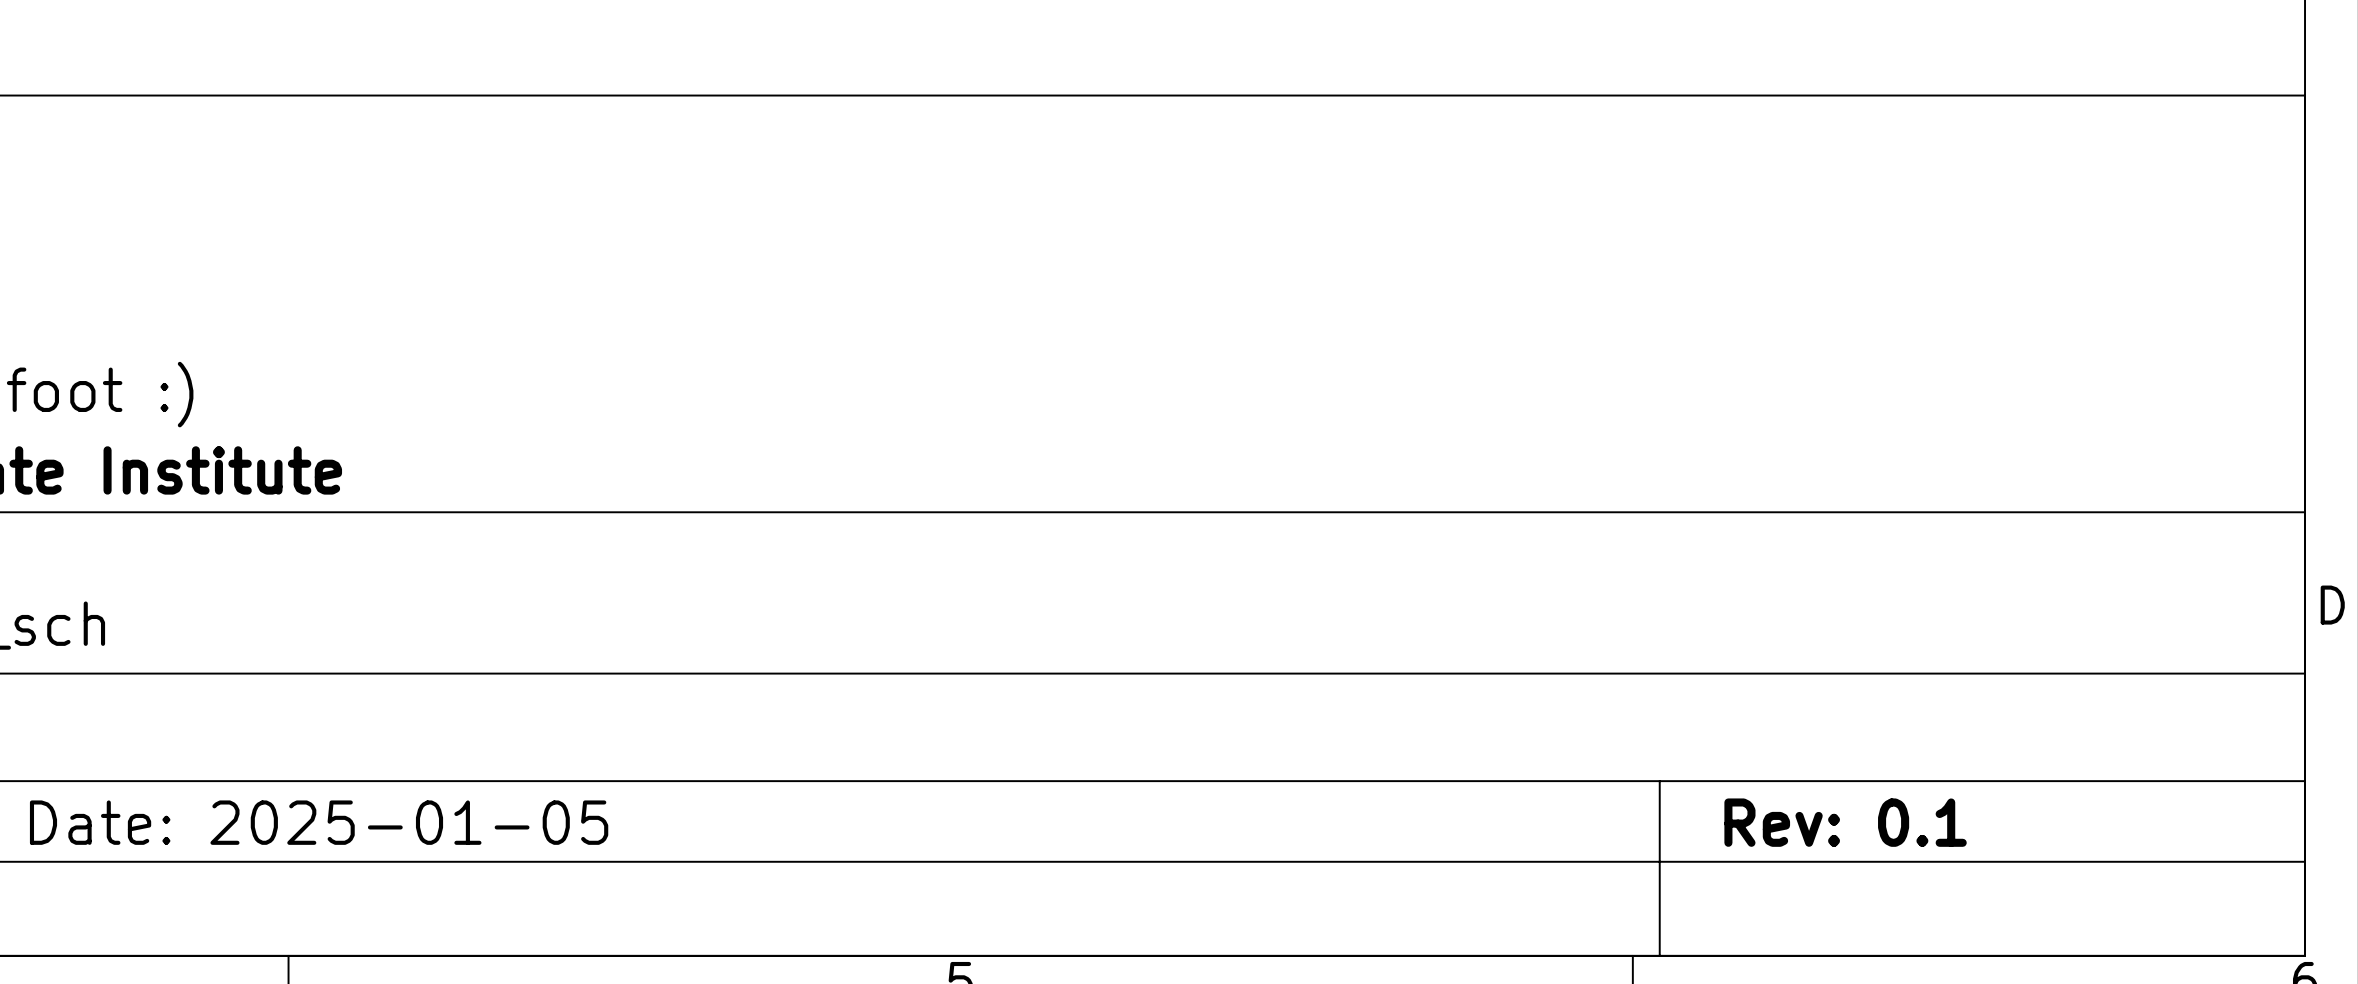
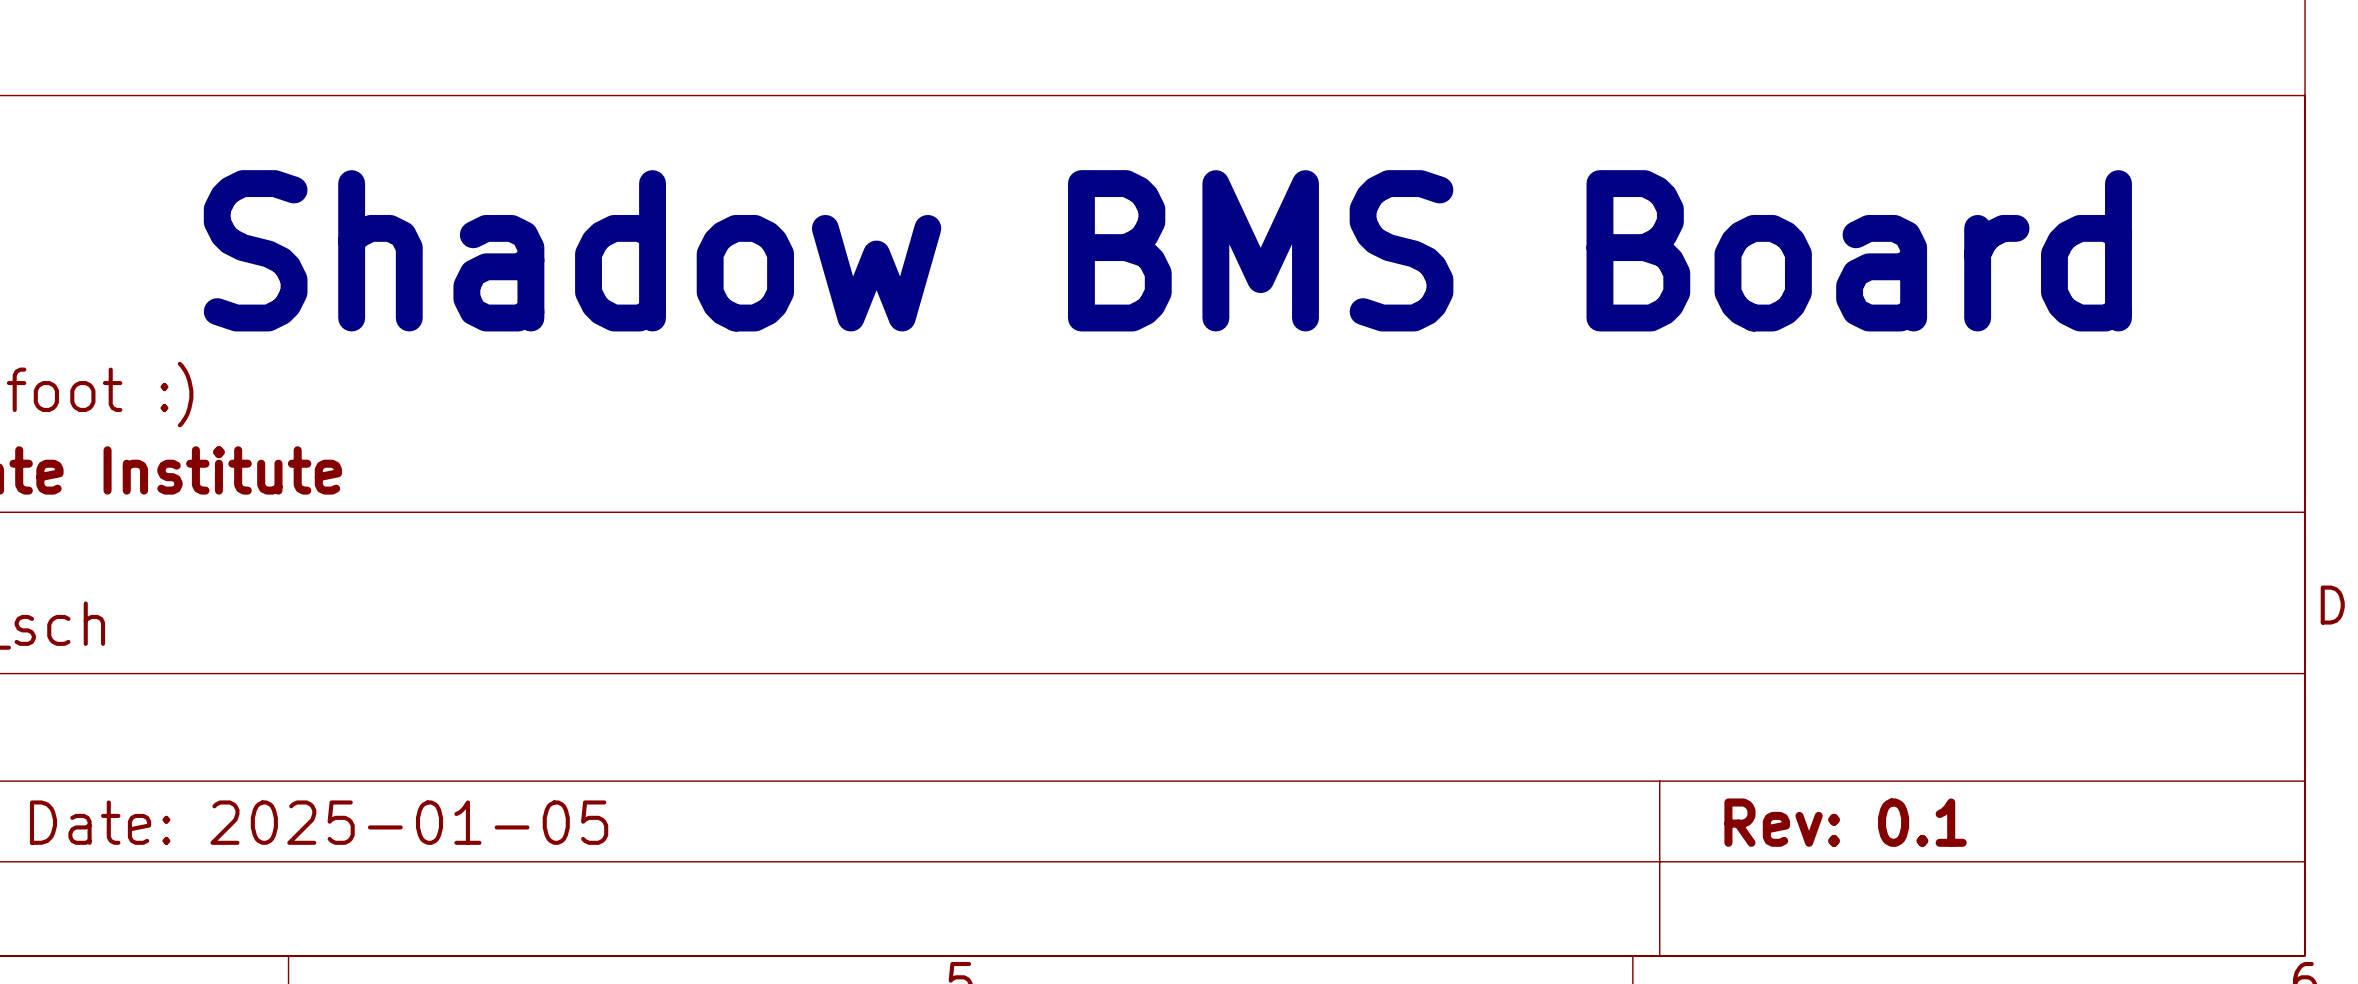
text: none -> Shadow BMS Board (1167, 250)

